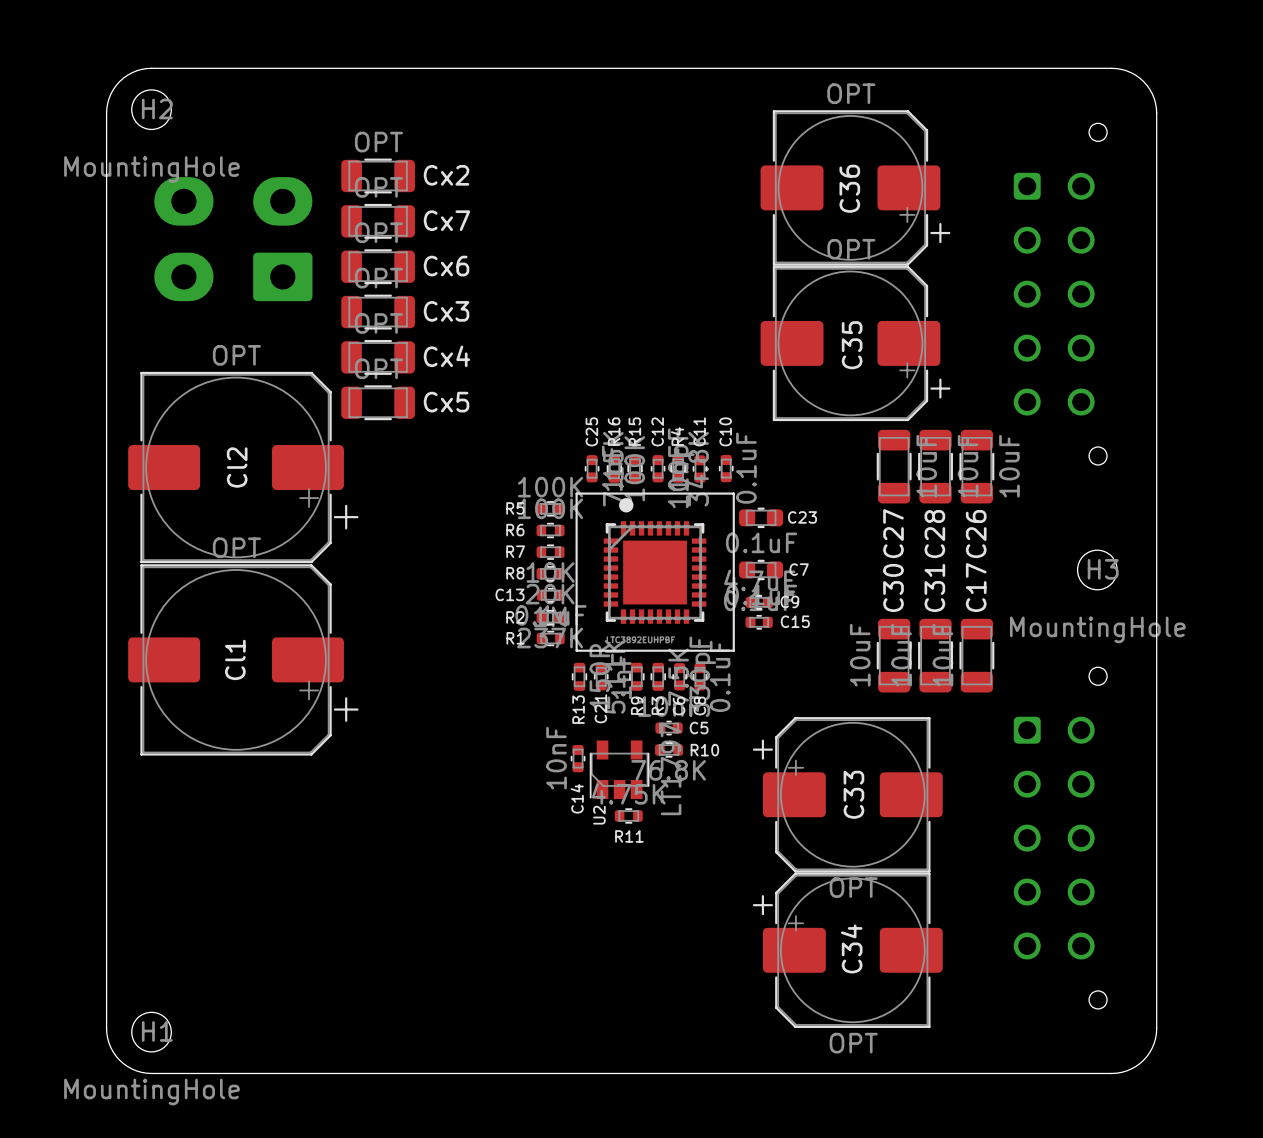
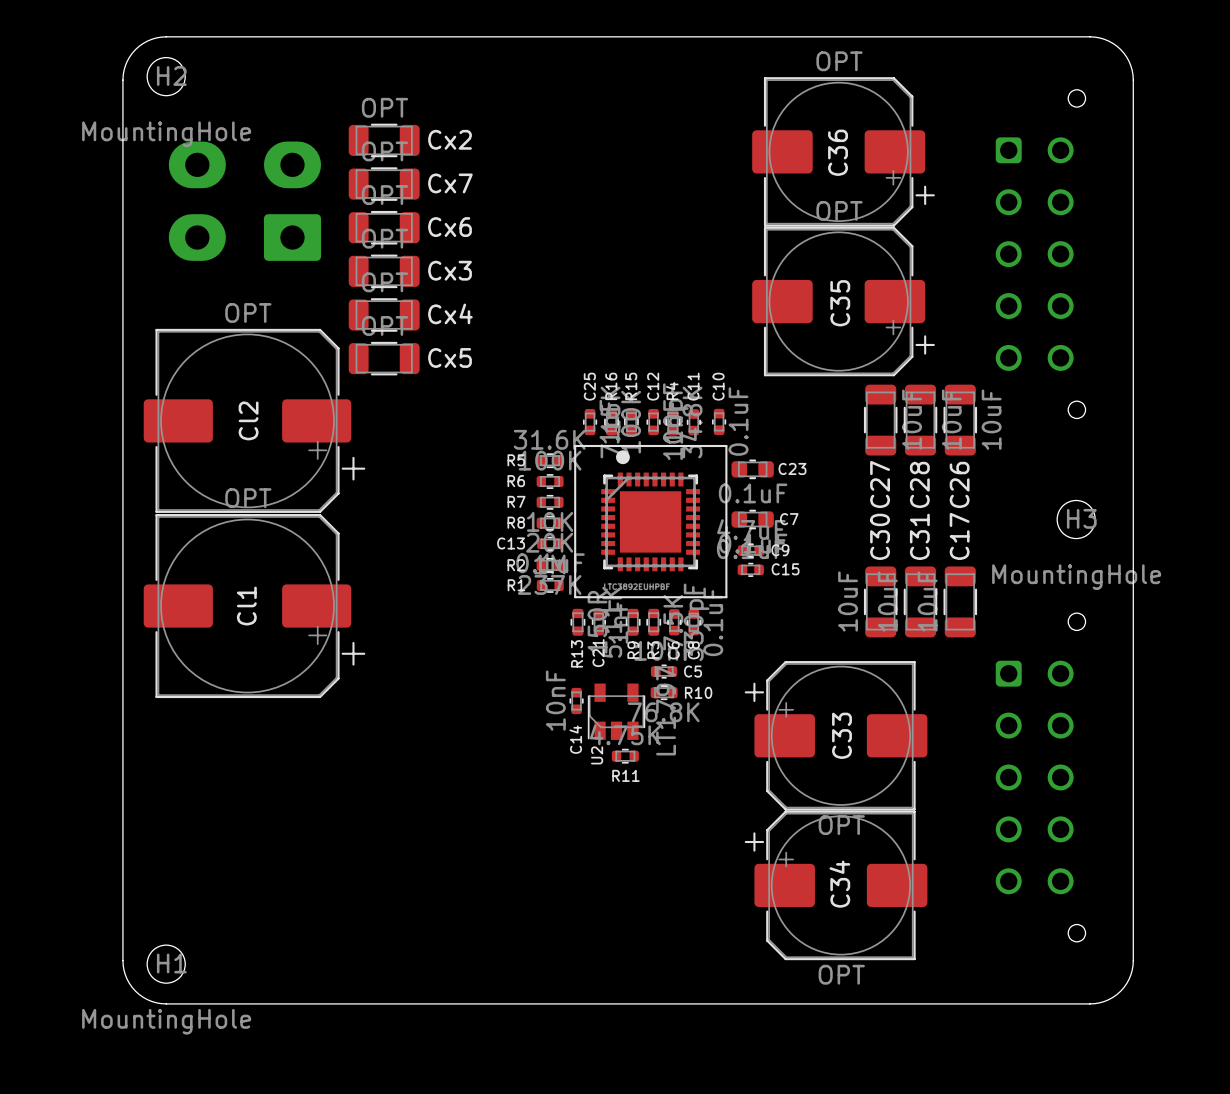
R5 value: 100K (550, 487) -> 31.6K (549, 439)

